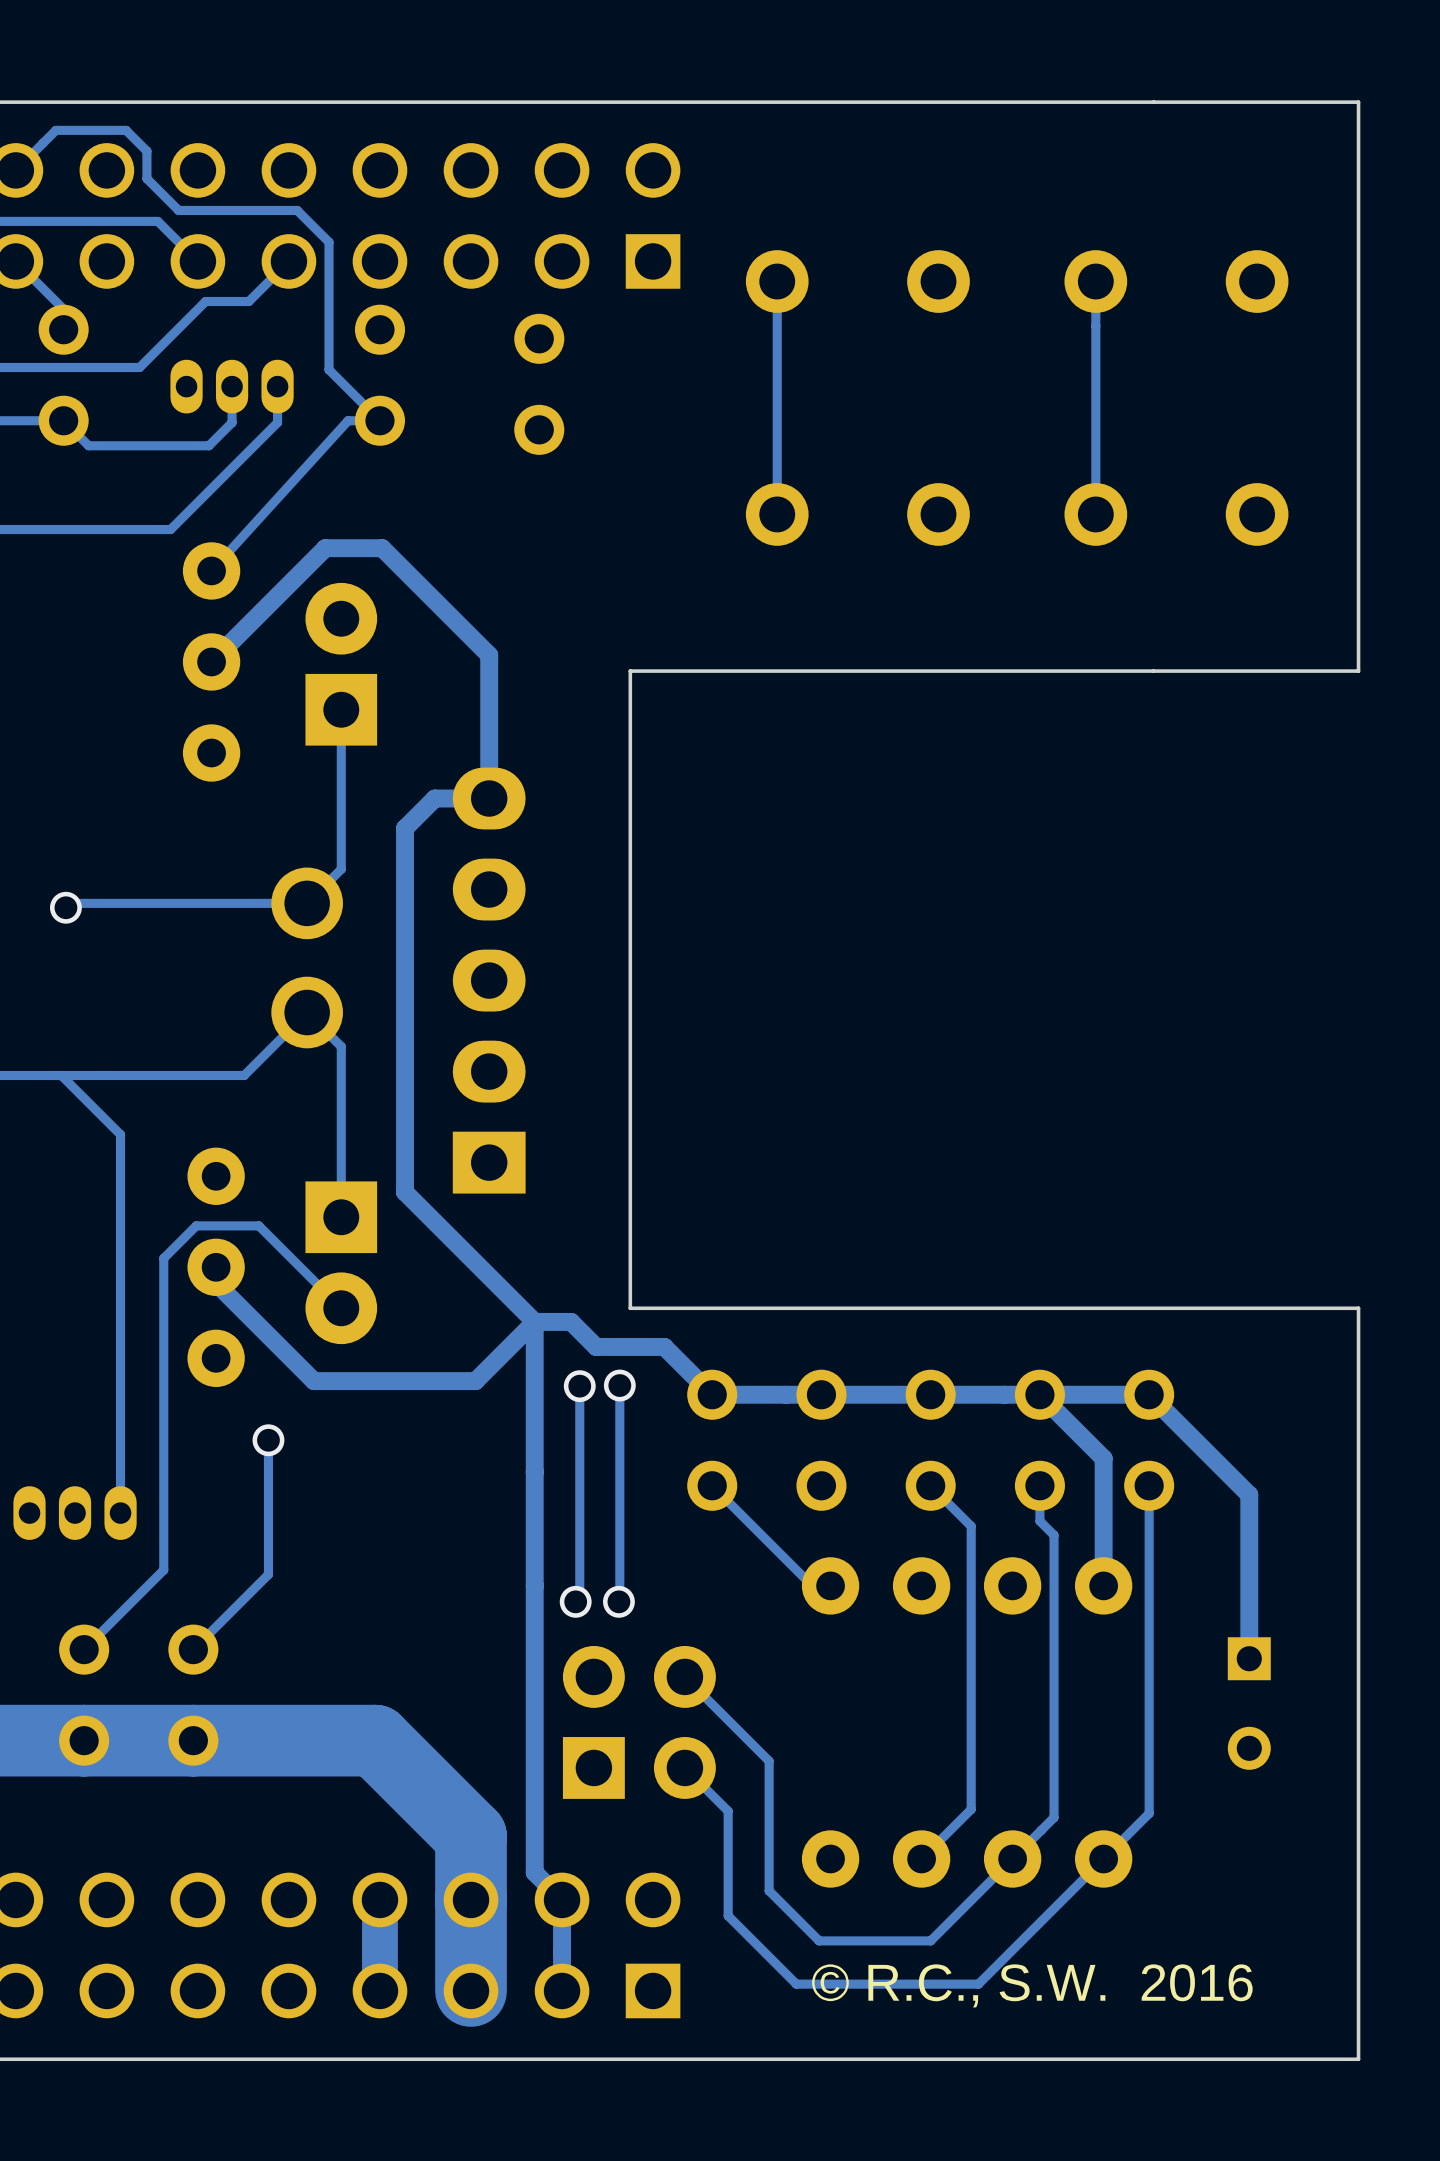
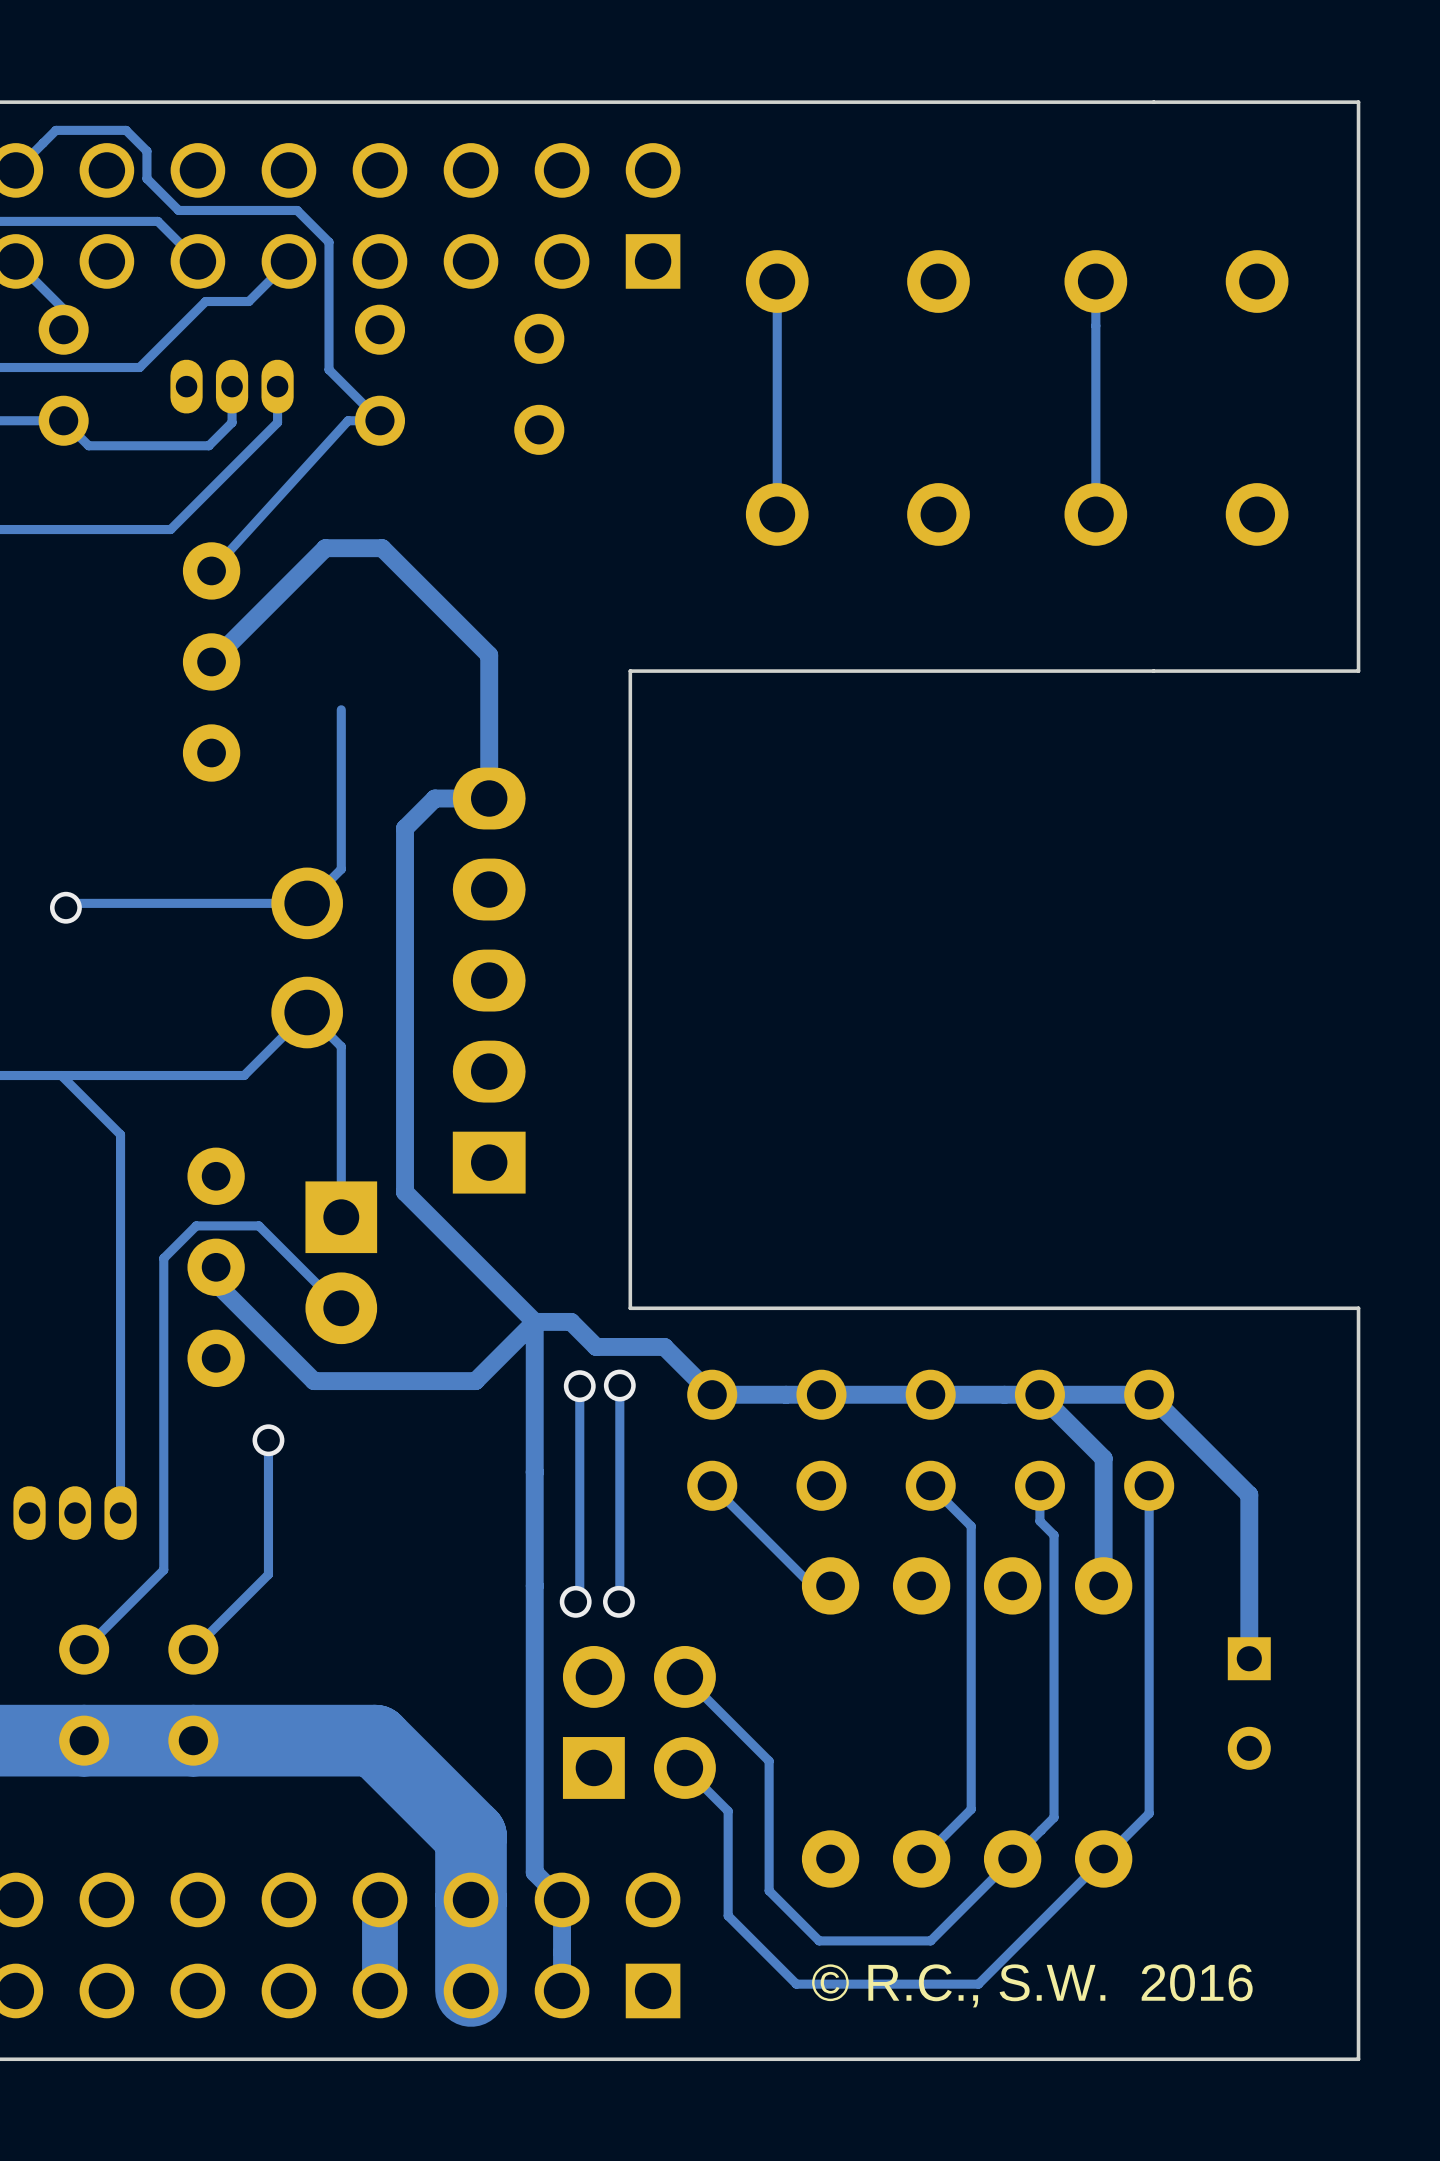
part: (341, 664) -> none

